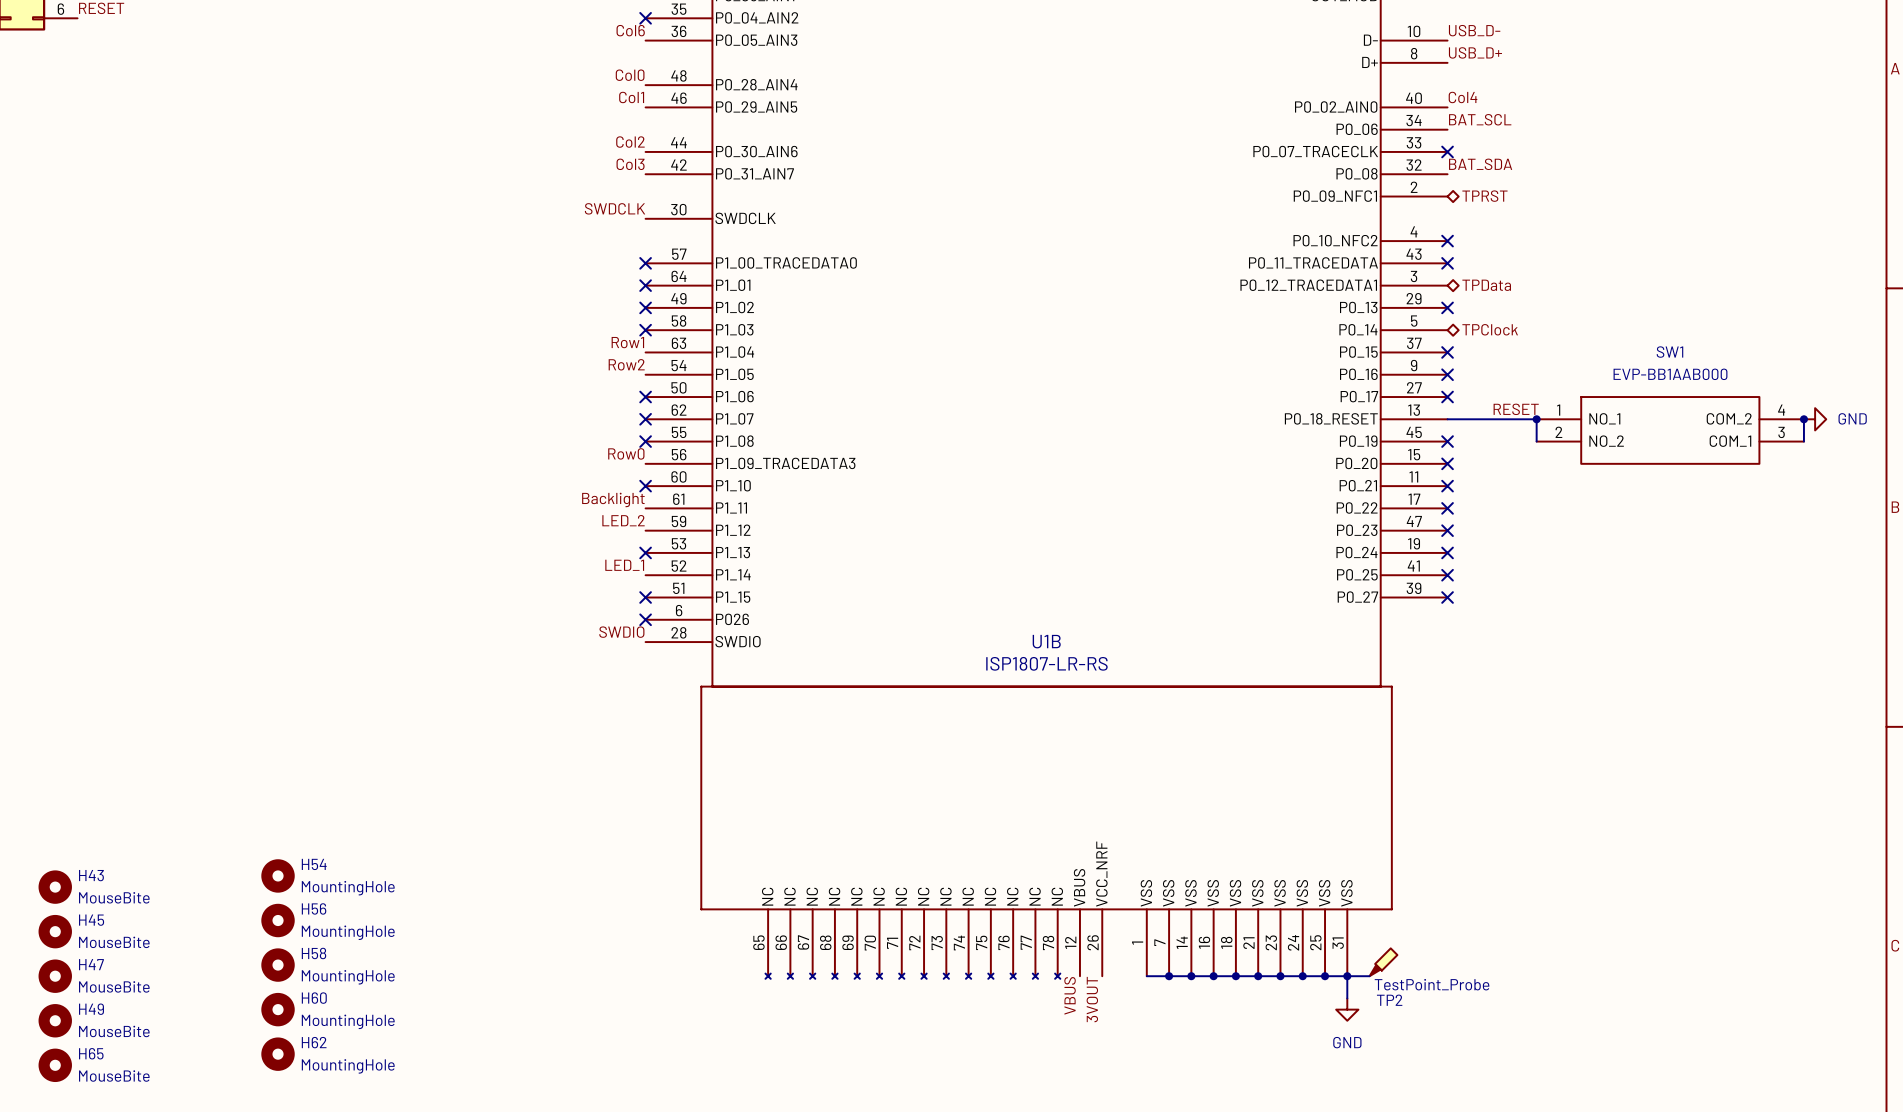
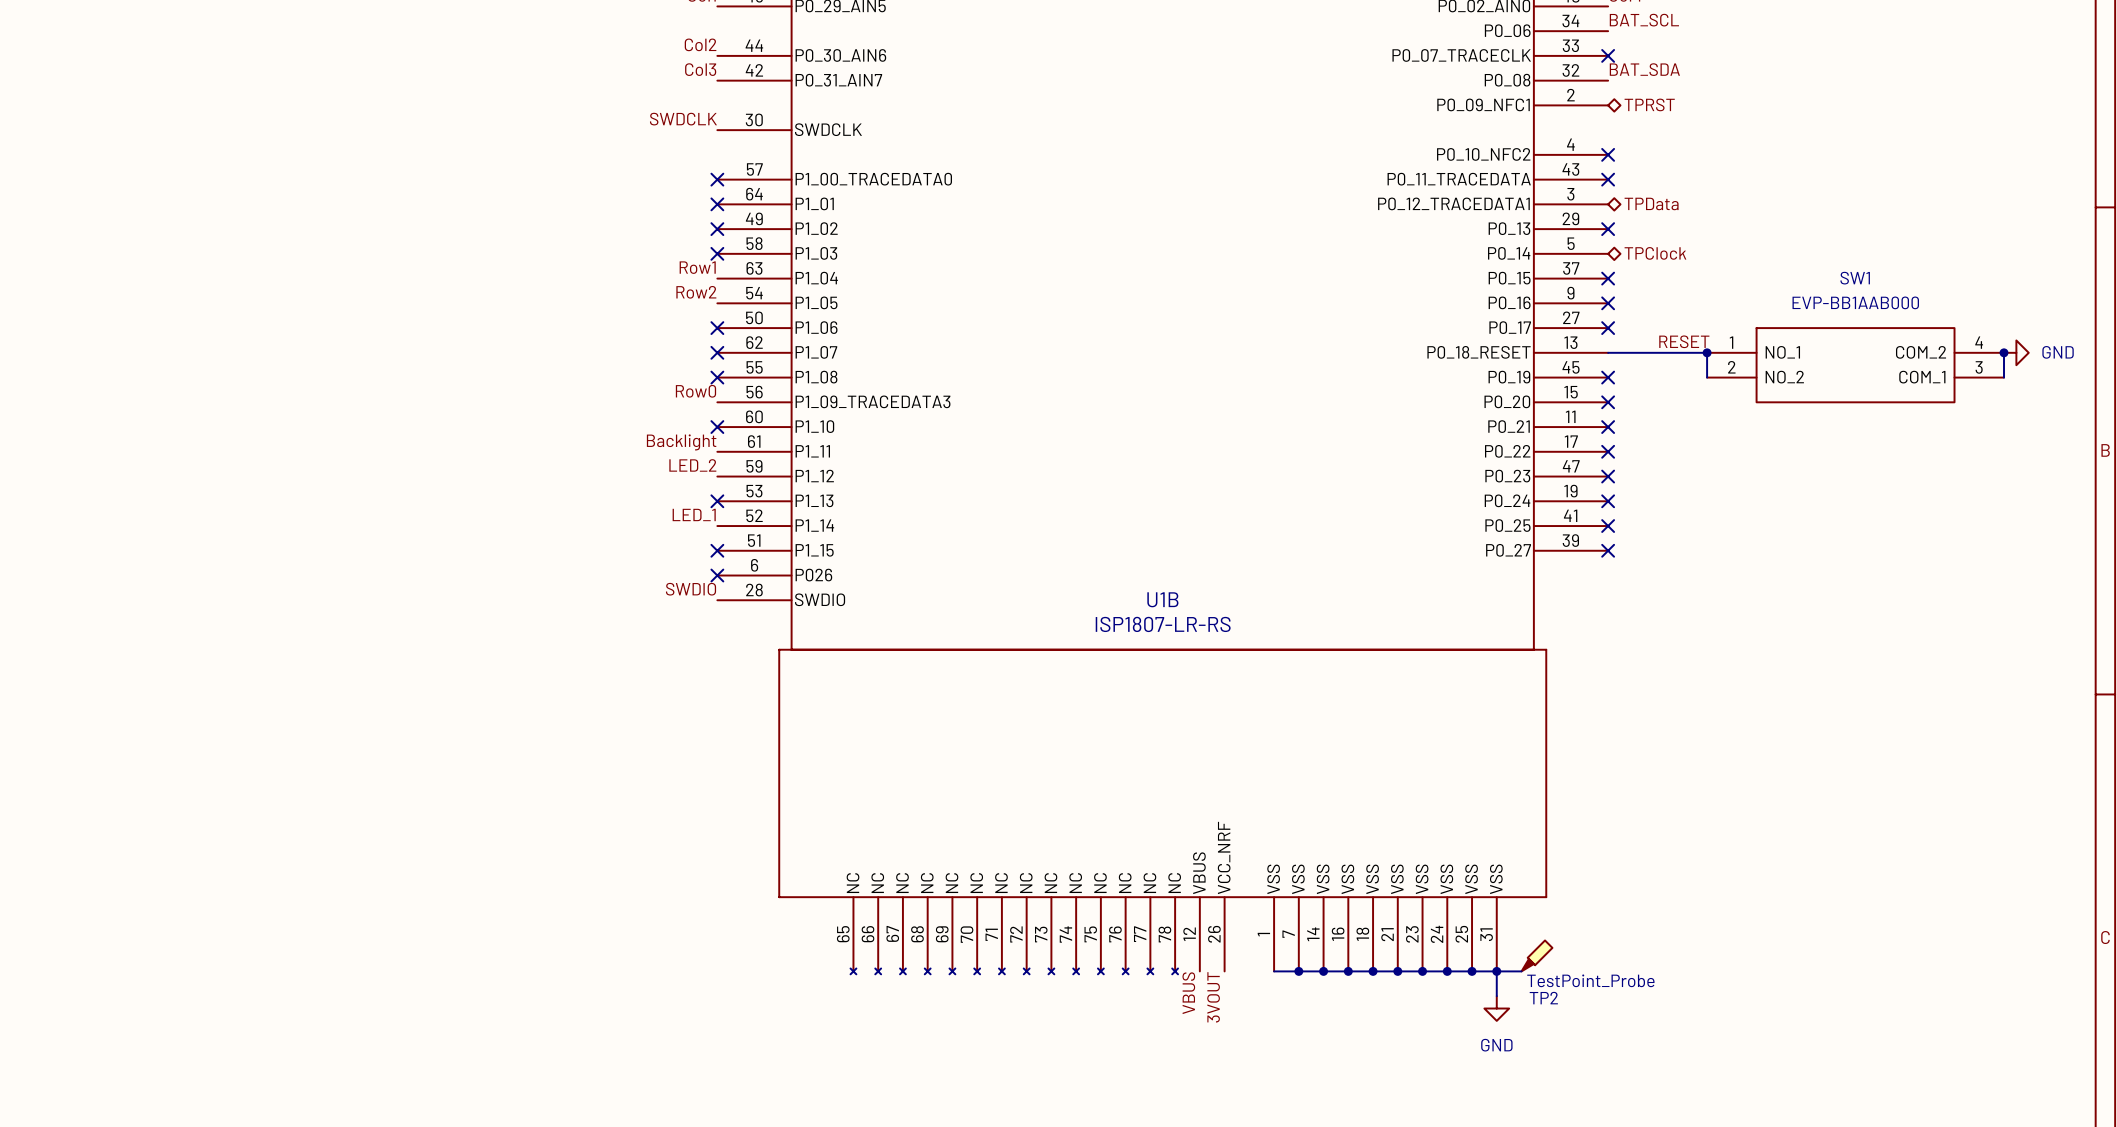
H54: MountingHole (278, 875) -> none
H43: MouseBite (55, 887) -> none
H56: MountingHole (278, 920) -> none
H45: MouseBite (55, 931) -> none
H58: MountingHole (278, 965) -> none
H47: MouseBite (55, 976) -> none
H60: MountingHole (278, 1009) -> none
H49: MouseBite (55, 1020) -> none
H62: MountingHole (278, 1054) -> none
H65: MouseBite (55, 1065) -> none

